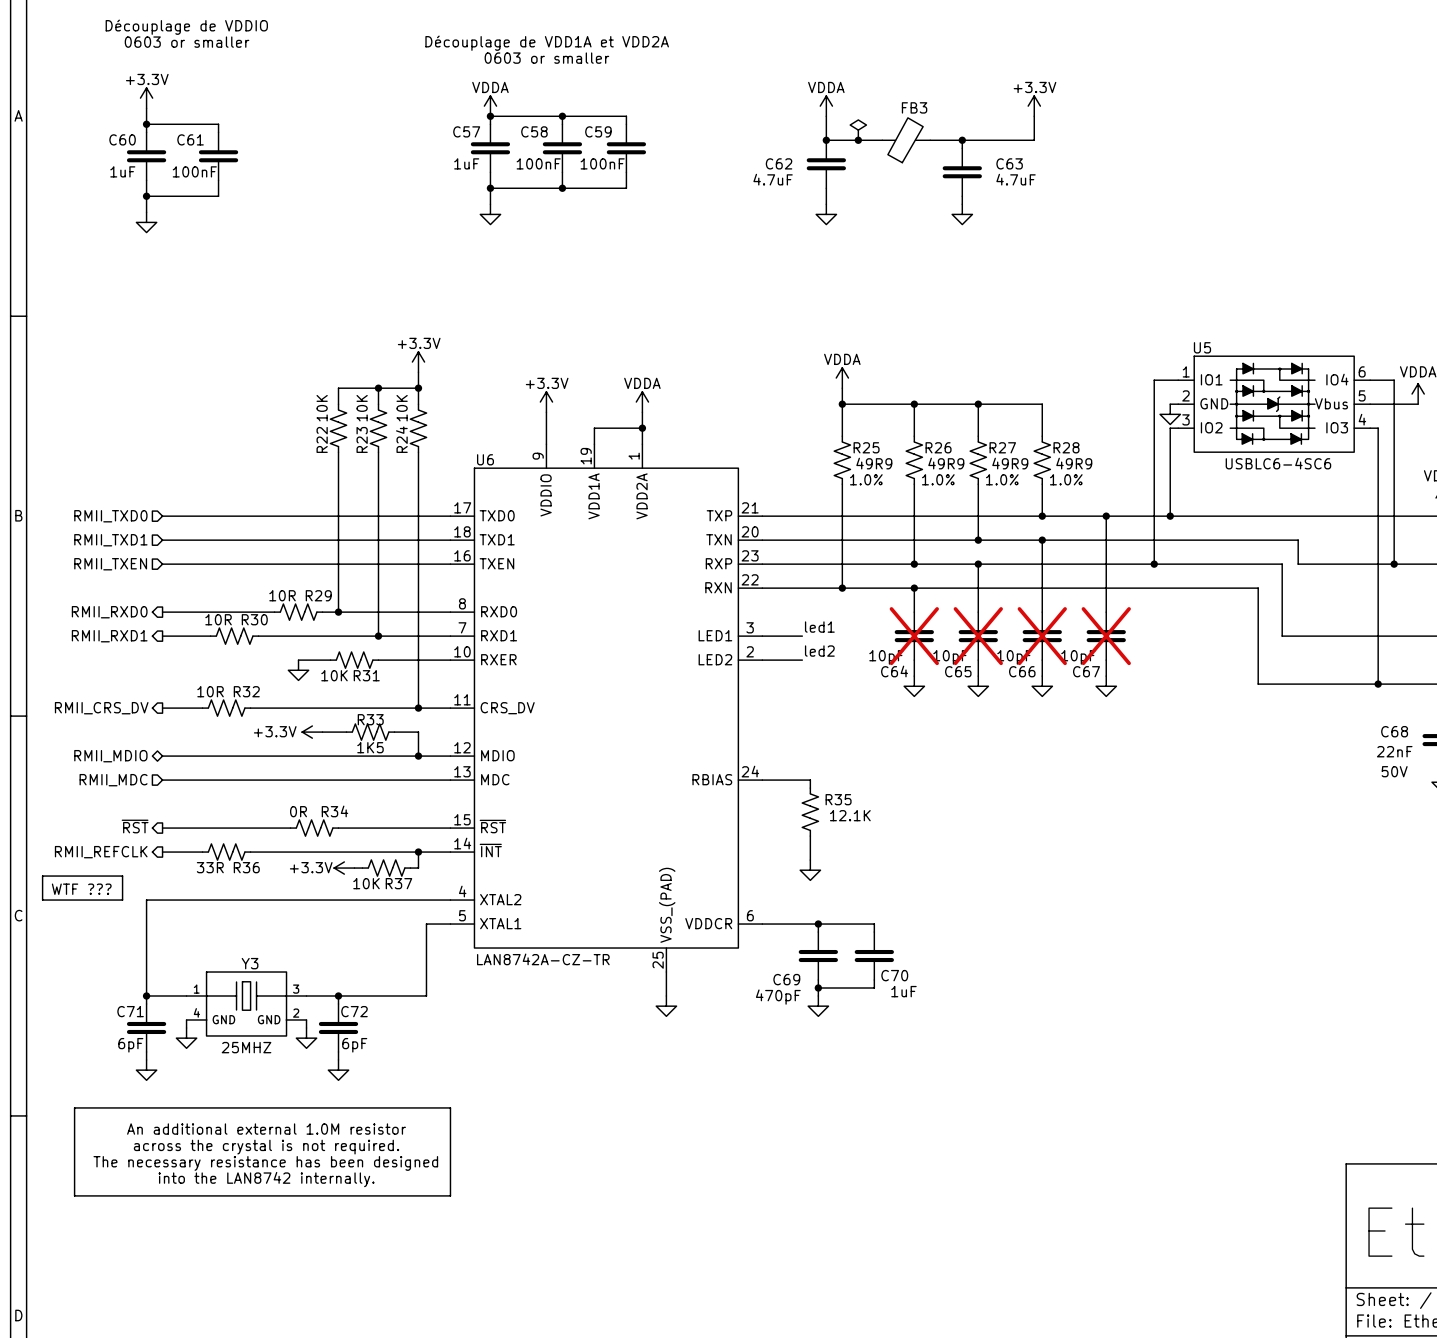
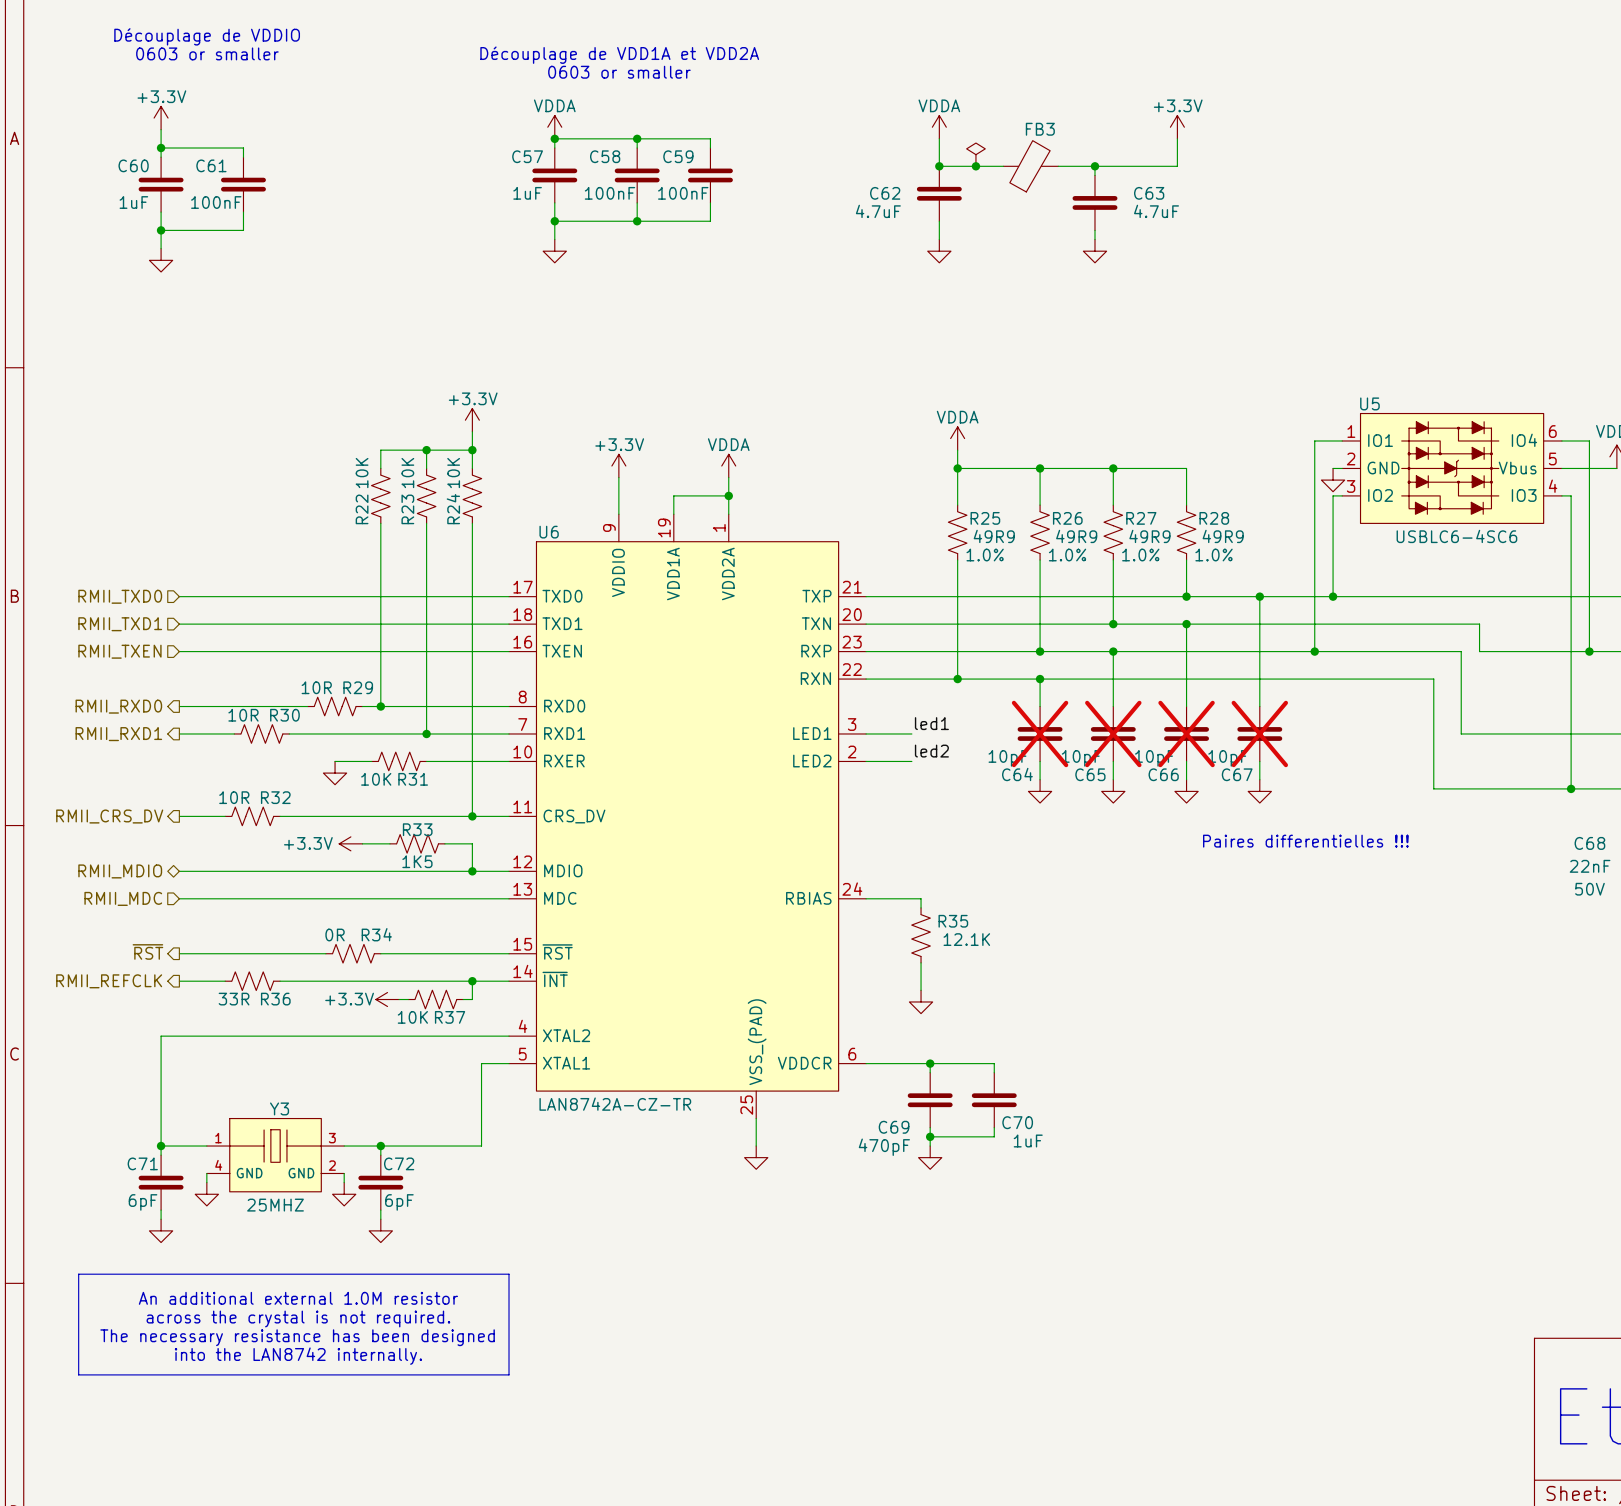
text: none -> Paires differentielles !!! (1305, 841)
line: (42, 876) (122, 876) (122, 900) (42, 900) (42, 876) -> none
text: WTF ??? (81, 889) -> none

